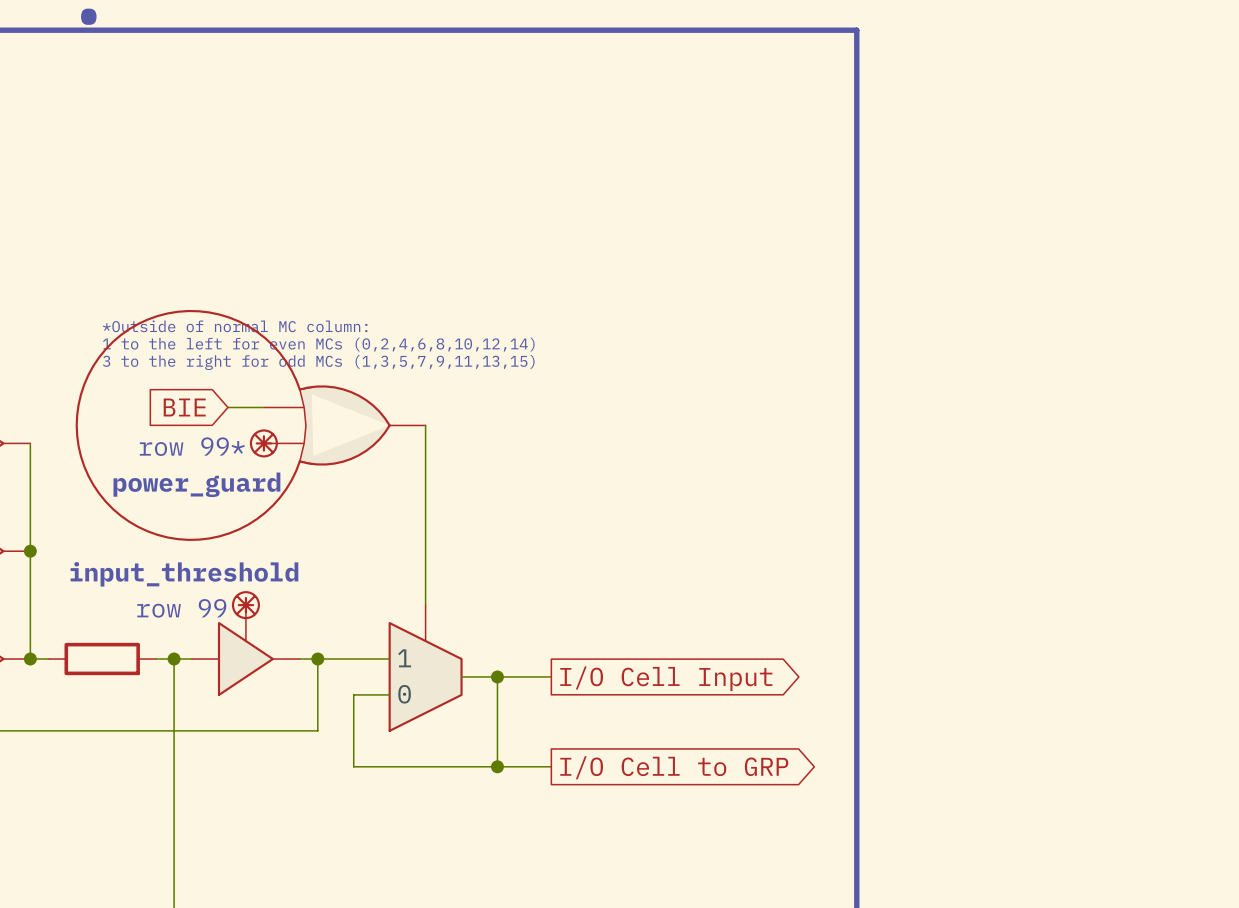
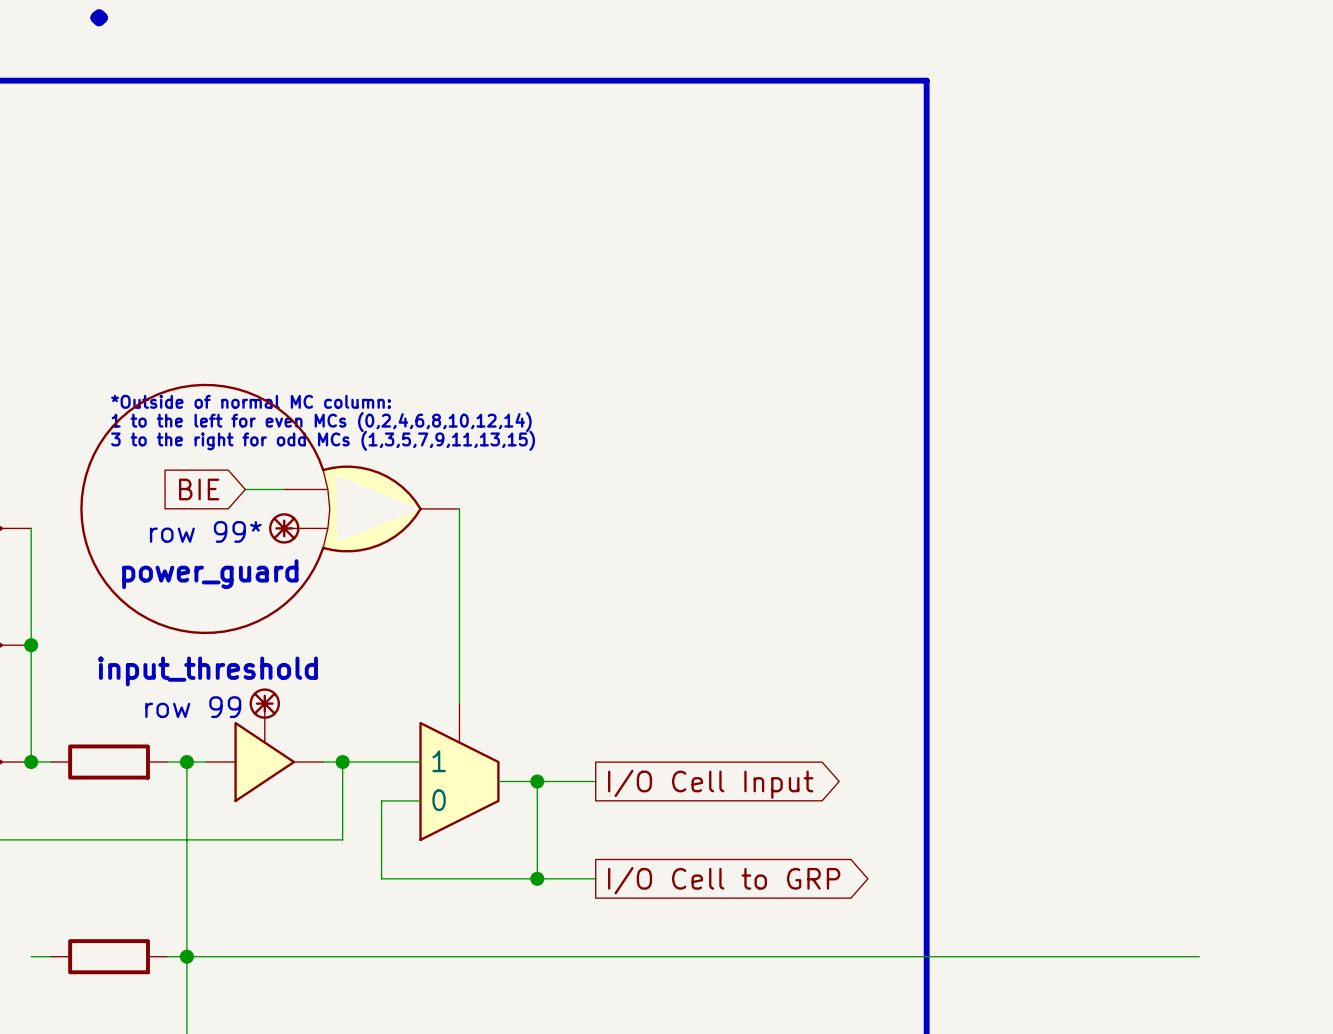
wire: none -> (31, 956) (50, 956)
part: none -> (109, 956)
wire: none -> (167, 956) (1199, 956)
junction: none -> (186, 956)

